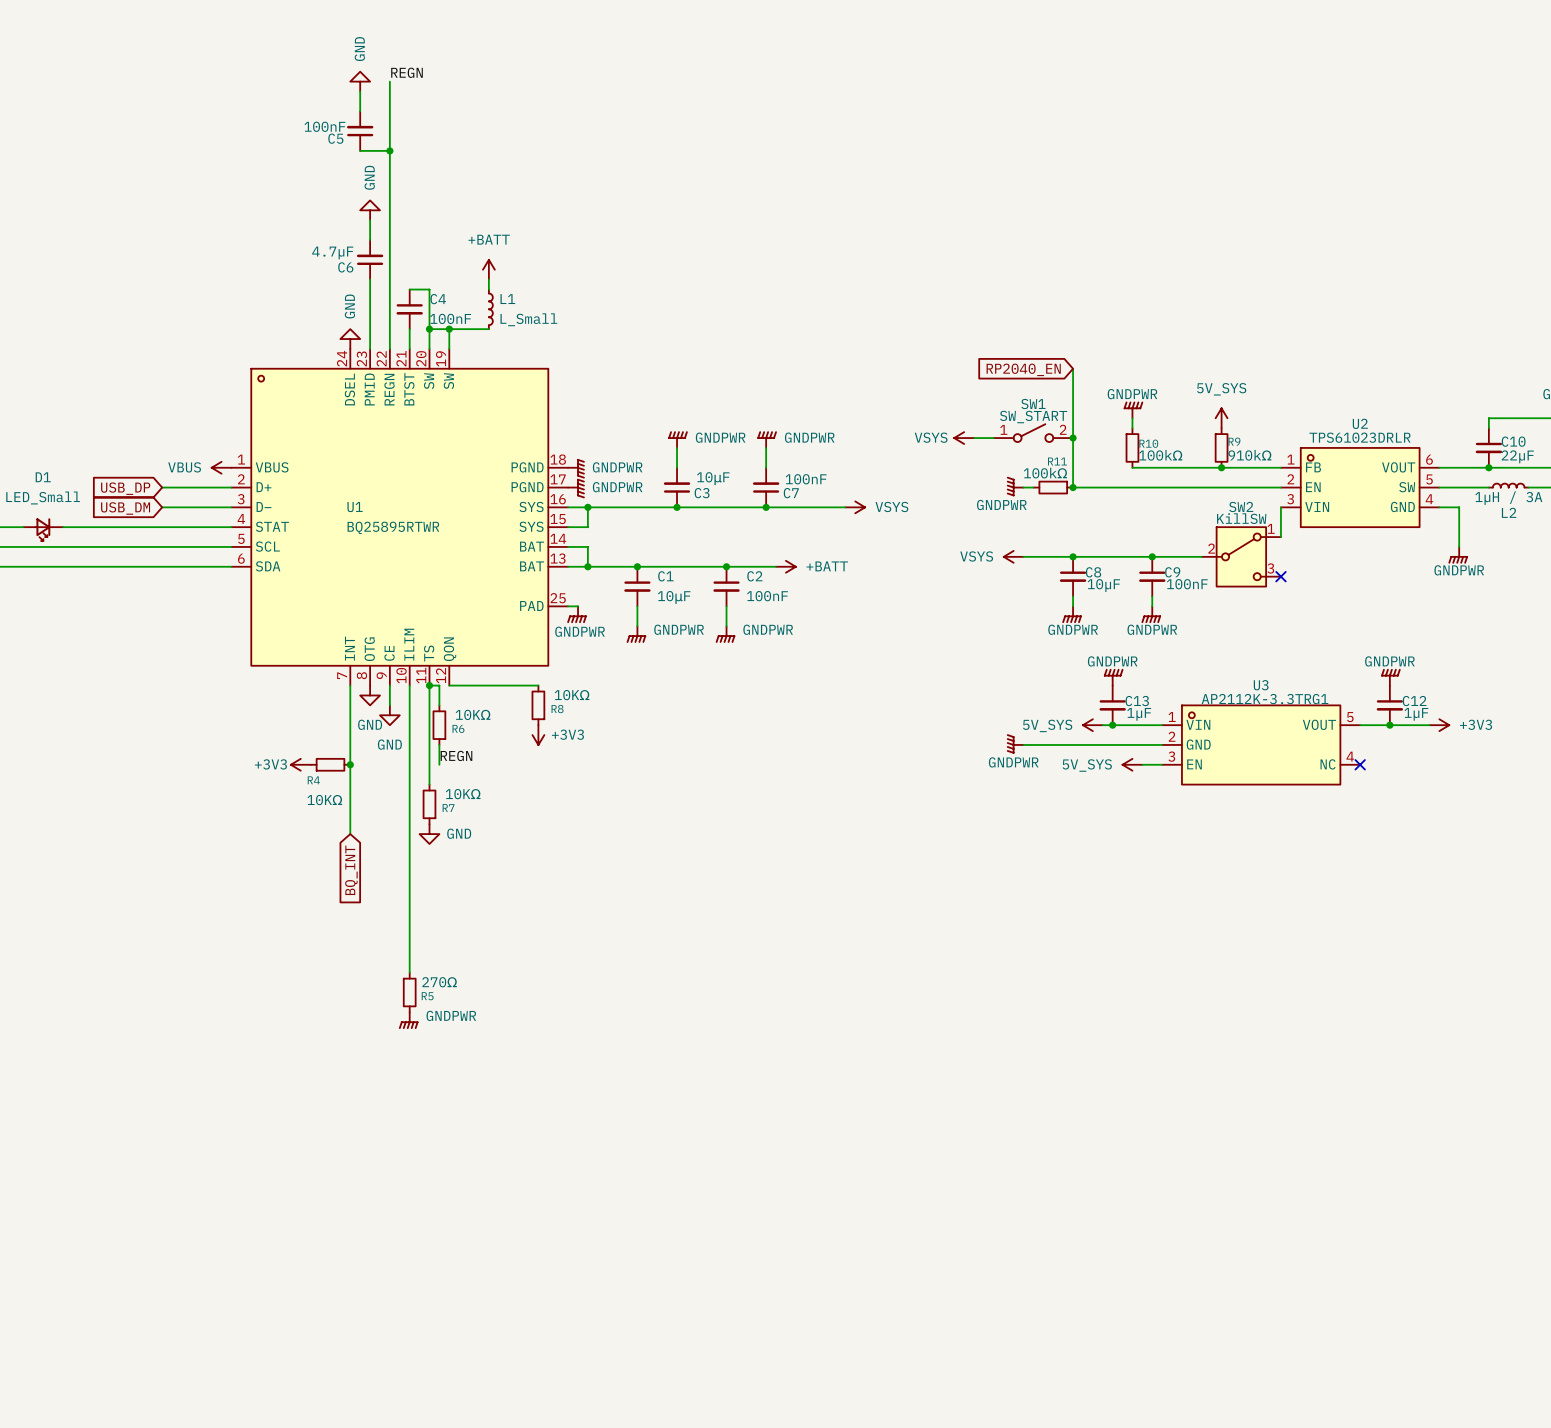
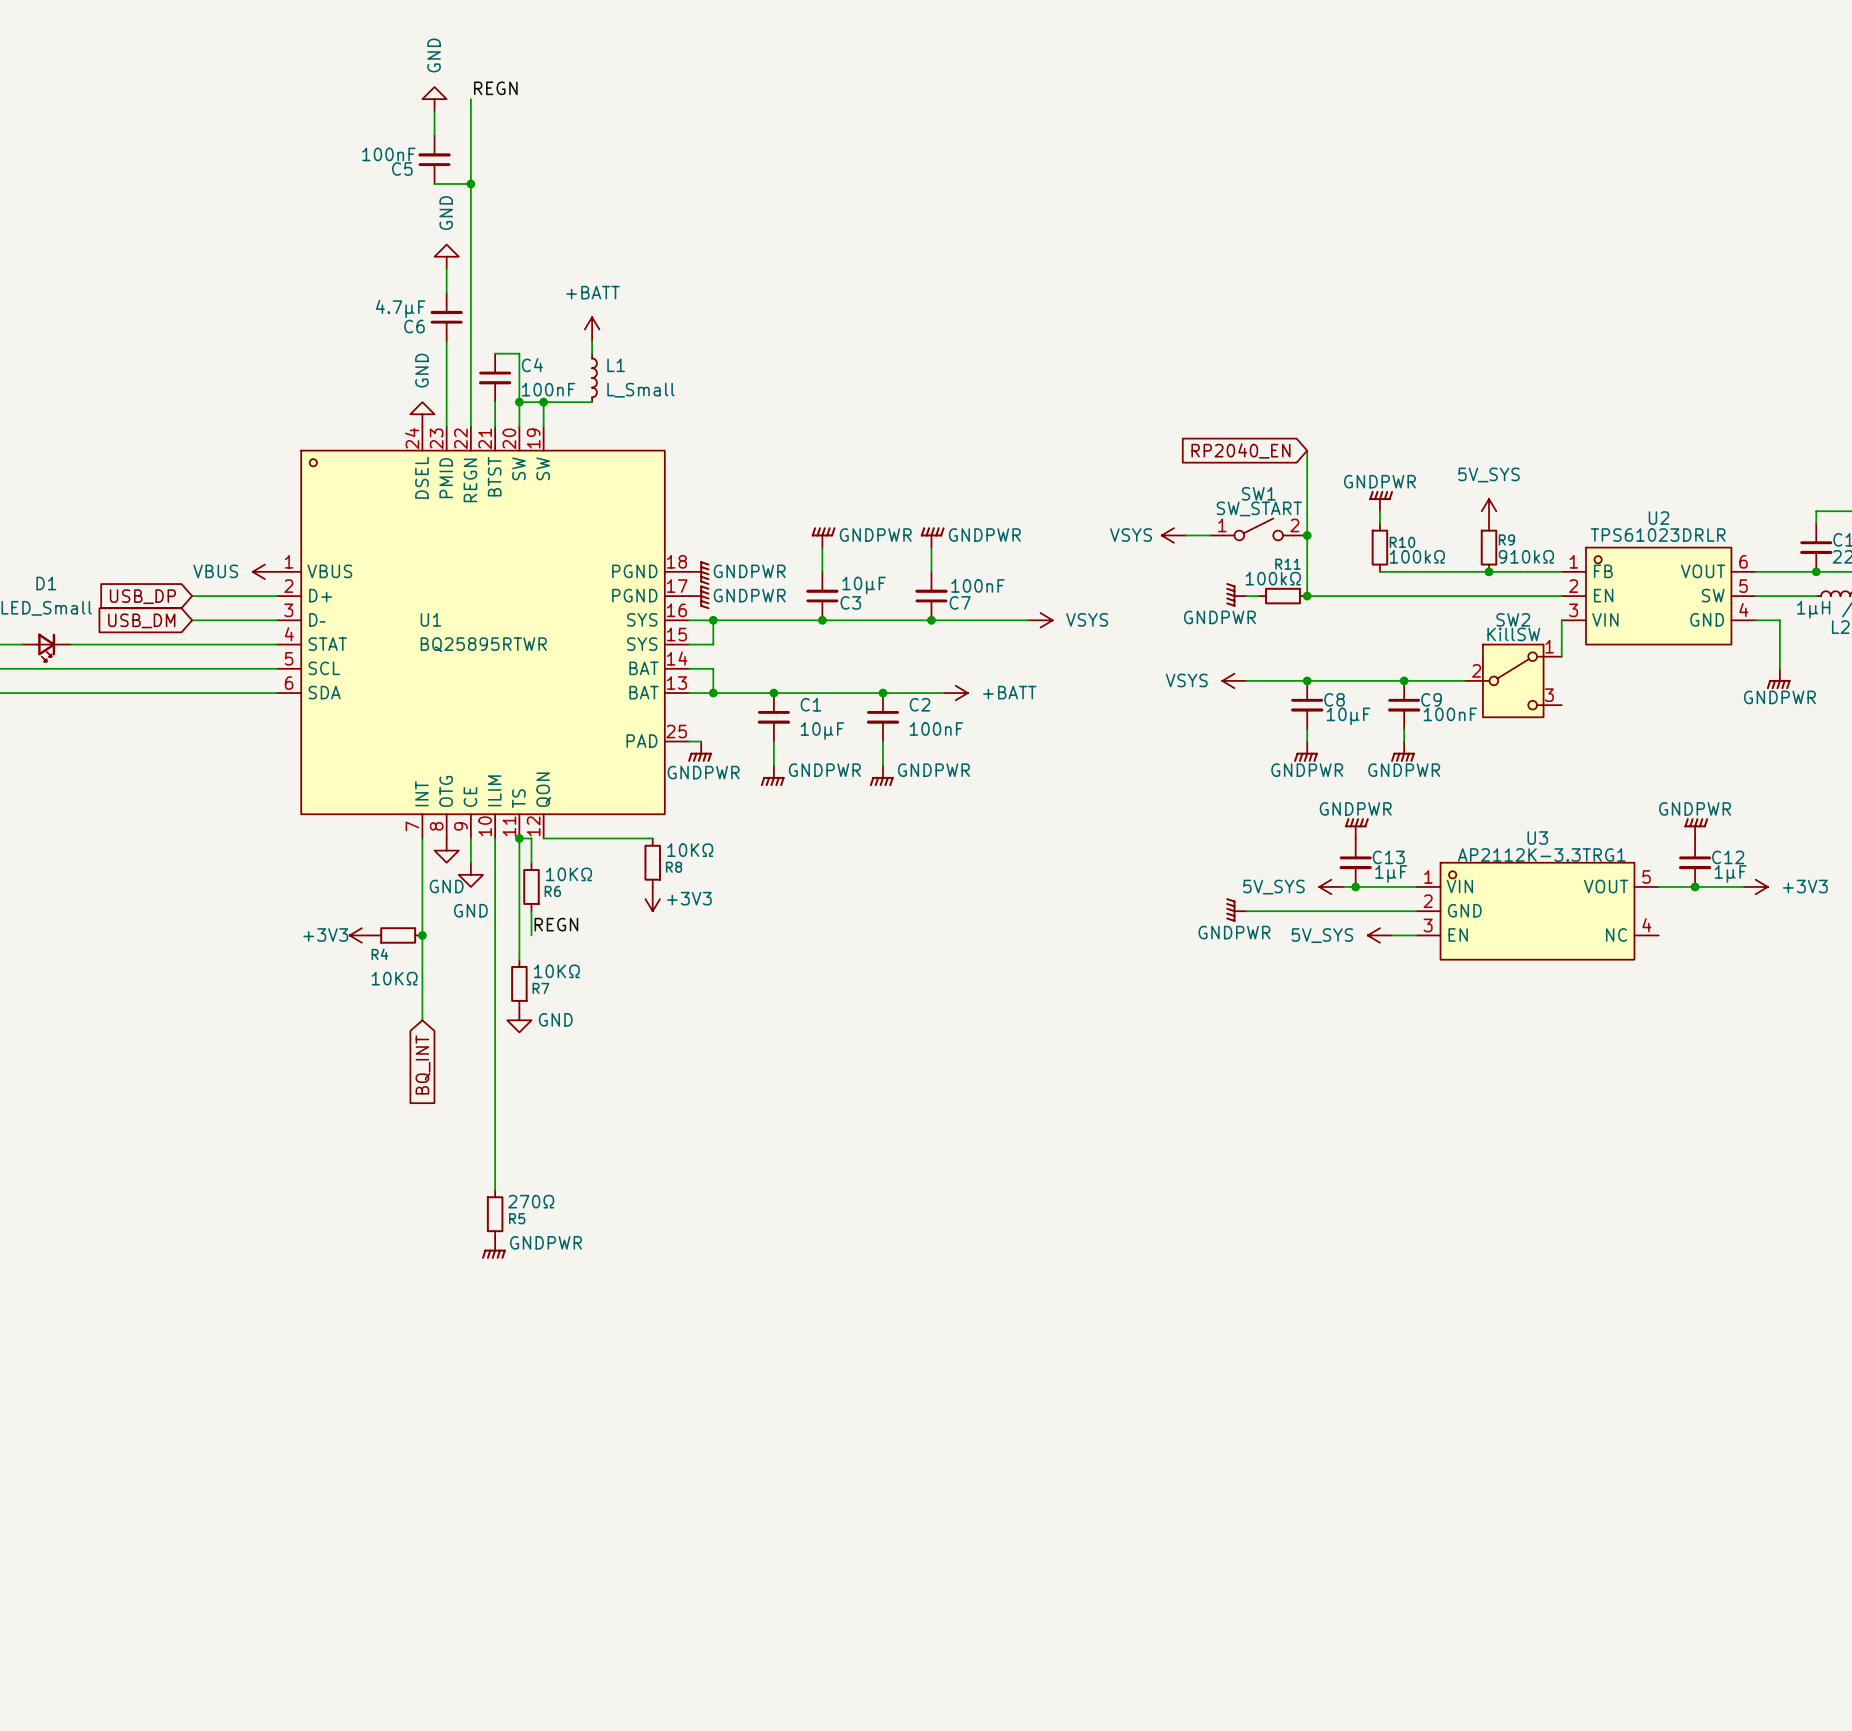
no-connect mark: (1280, 576) -> none
no-connect mark: (1360, 764) -> none

